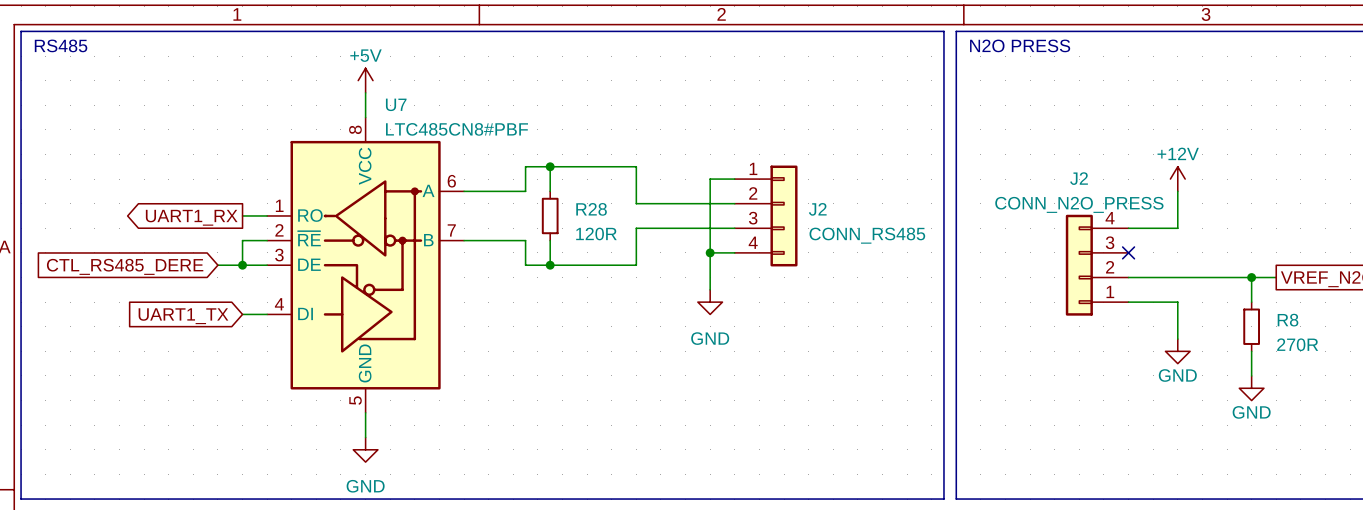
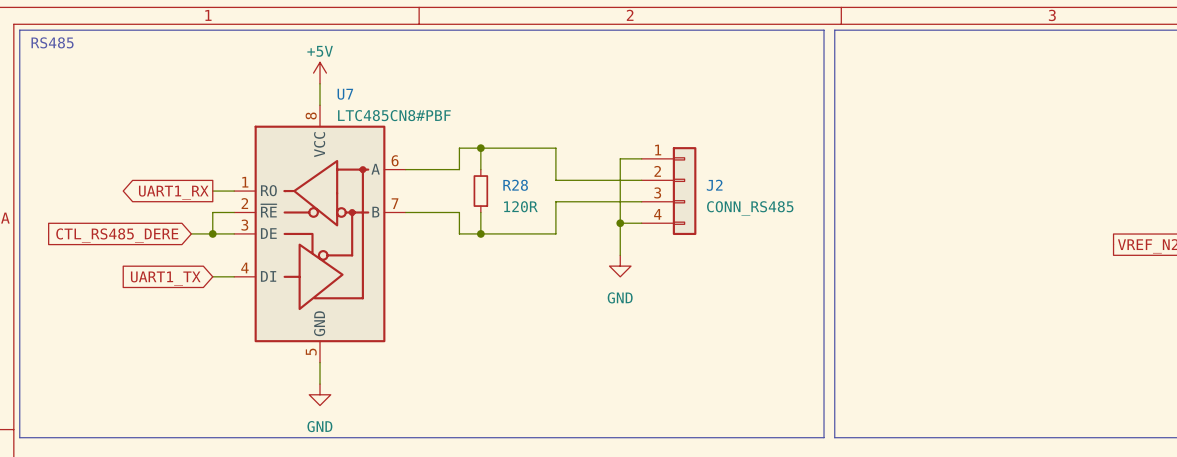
text: N2O PRESS (1020, 45) -> none
power symbol: +12V (1177, 179) -> none
wire: (1177, 191) (1177, 228) (1128, 228) -> none
no-connect mark: (1128, 252) -> none
J2: CONN_N2O_PRESS (1097, 265) -> none
wire: (1128, 277) (1276, 277) -> none
wire: (1251, 277) (1251, 302) -> none
junction: (1251, 277) -> none
wire: (1128, 302) (1177, 302) (1177, 339) -> none
R8: 270R (1251, 326) -> none
power symbol: GND (1177, 351) -> none
wire: (1251, 351) (1251, 375) -> none
power symbol: GND (1251, 388) -> none

